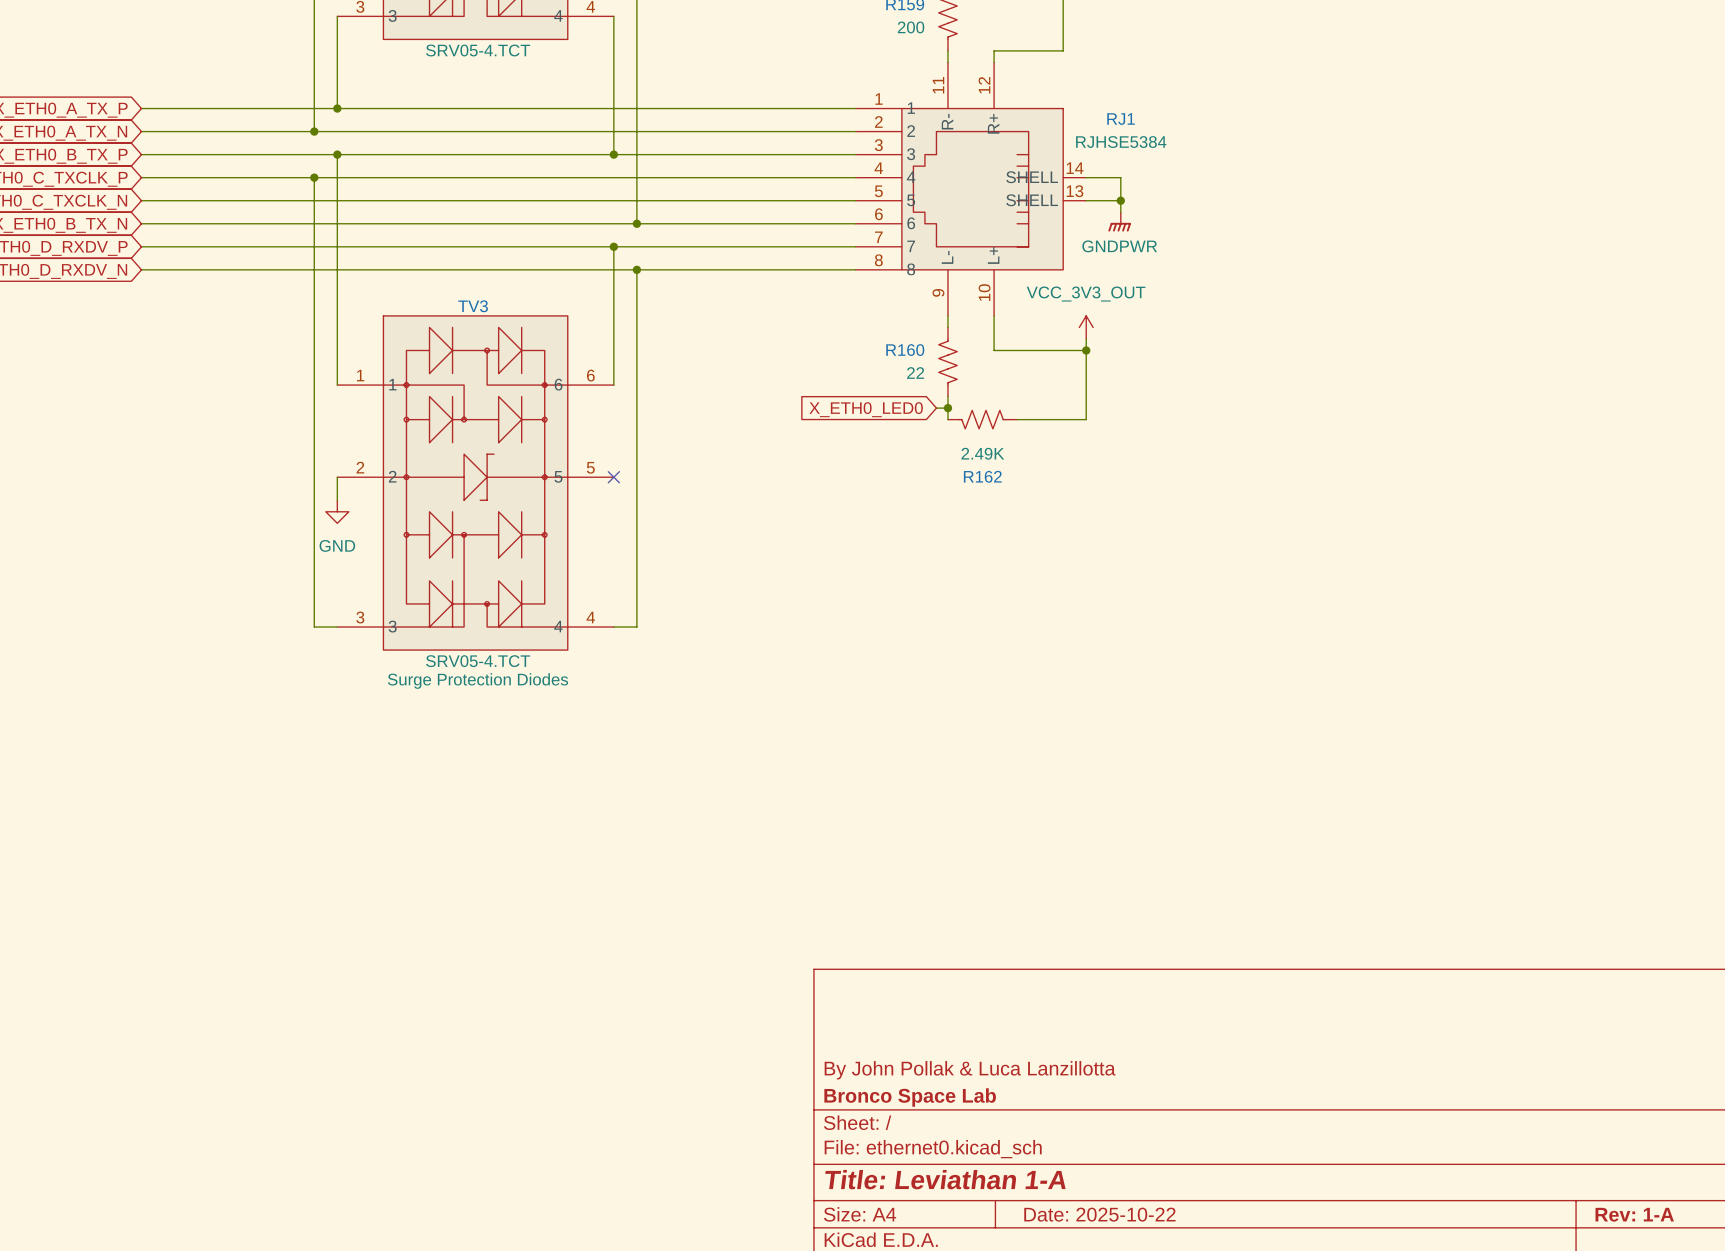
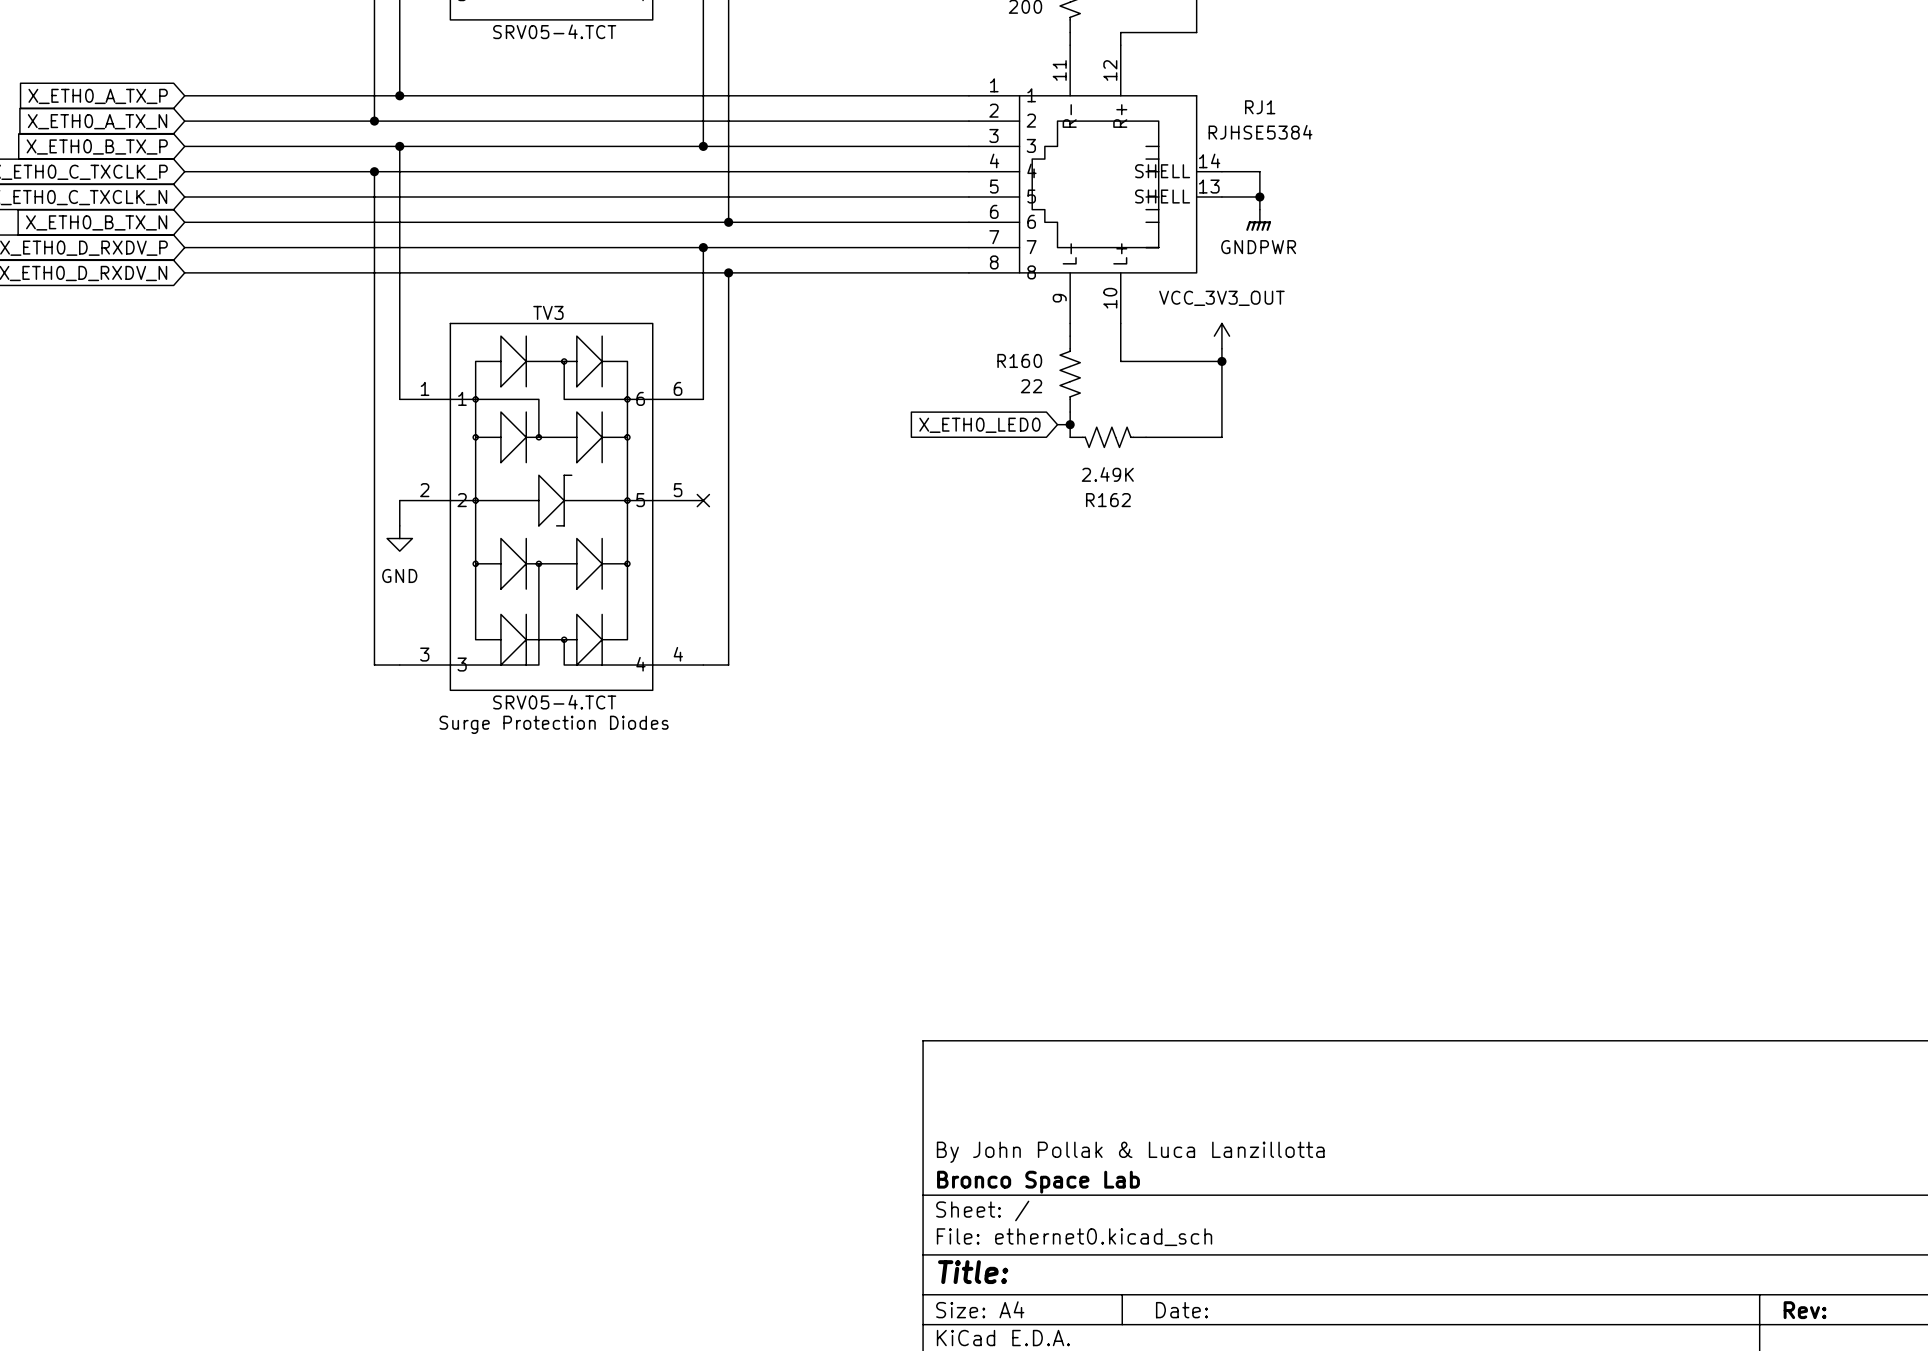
title block: Title: Leviathan 1-A (945, 1179) -> Title: (973, 1272)
title block: Date: 2025-10-22 (1099, 1214) -> Date: (1181, 1310)
title block: Rev: 1-A (1634, 1214) -> Rev: (1805, 1310)

